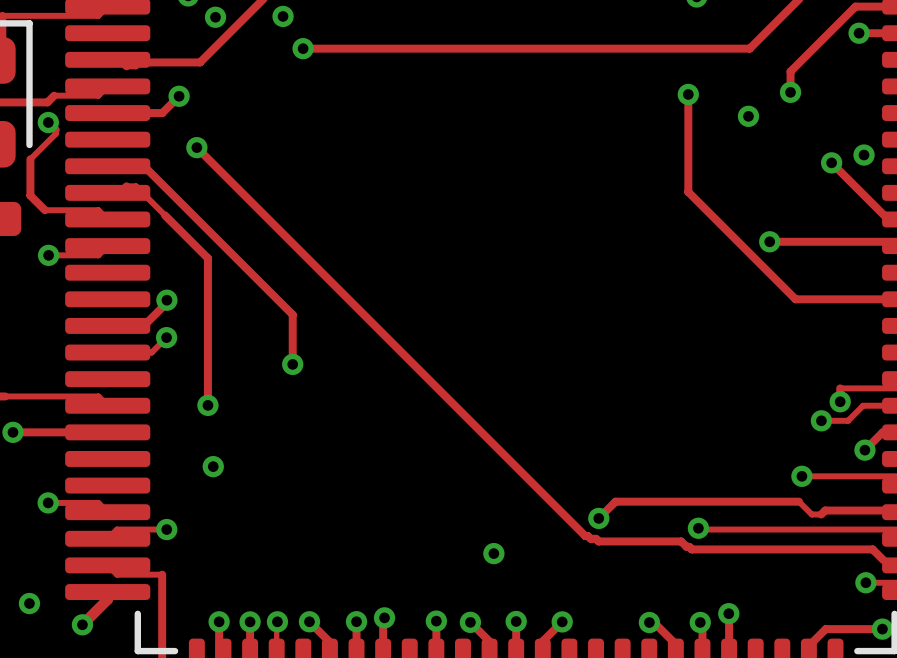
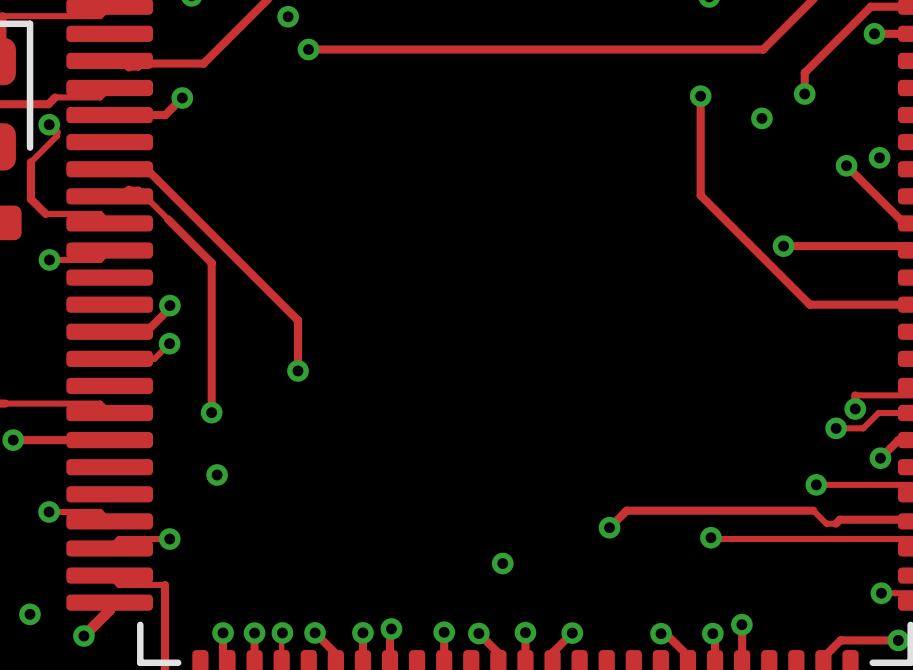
via: (215, 17) -> none
track: (196, 147) (585, 536) (598, 541) (681, 541) (691, 549) (872, 549) (883, 560) -> none
via: (196, 147) -> none

